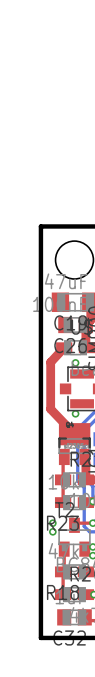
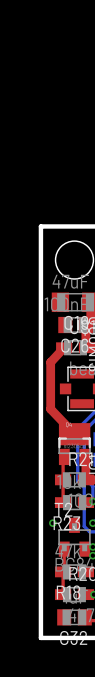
via: (75, 362) -> none
via: (75, 413) -> none
top track: (92, 523) (76, 523) (74, 525) -> none
via: (52, 531) -> none

